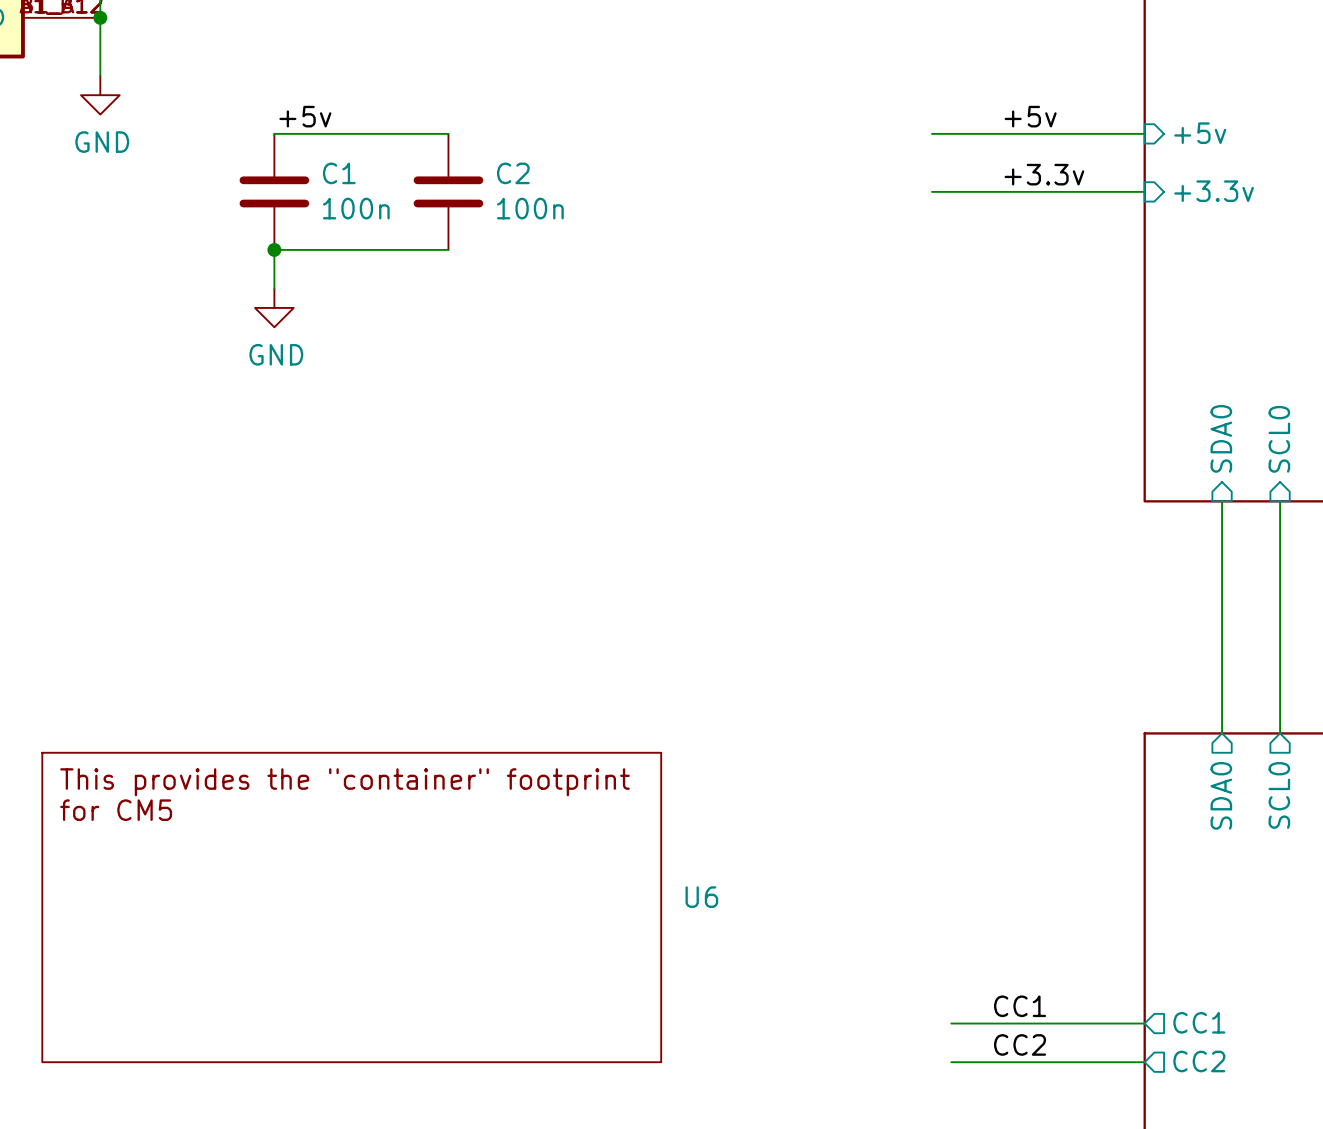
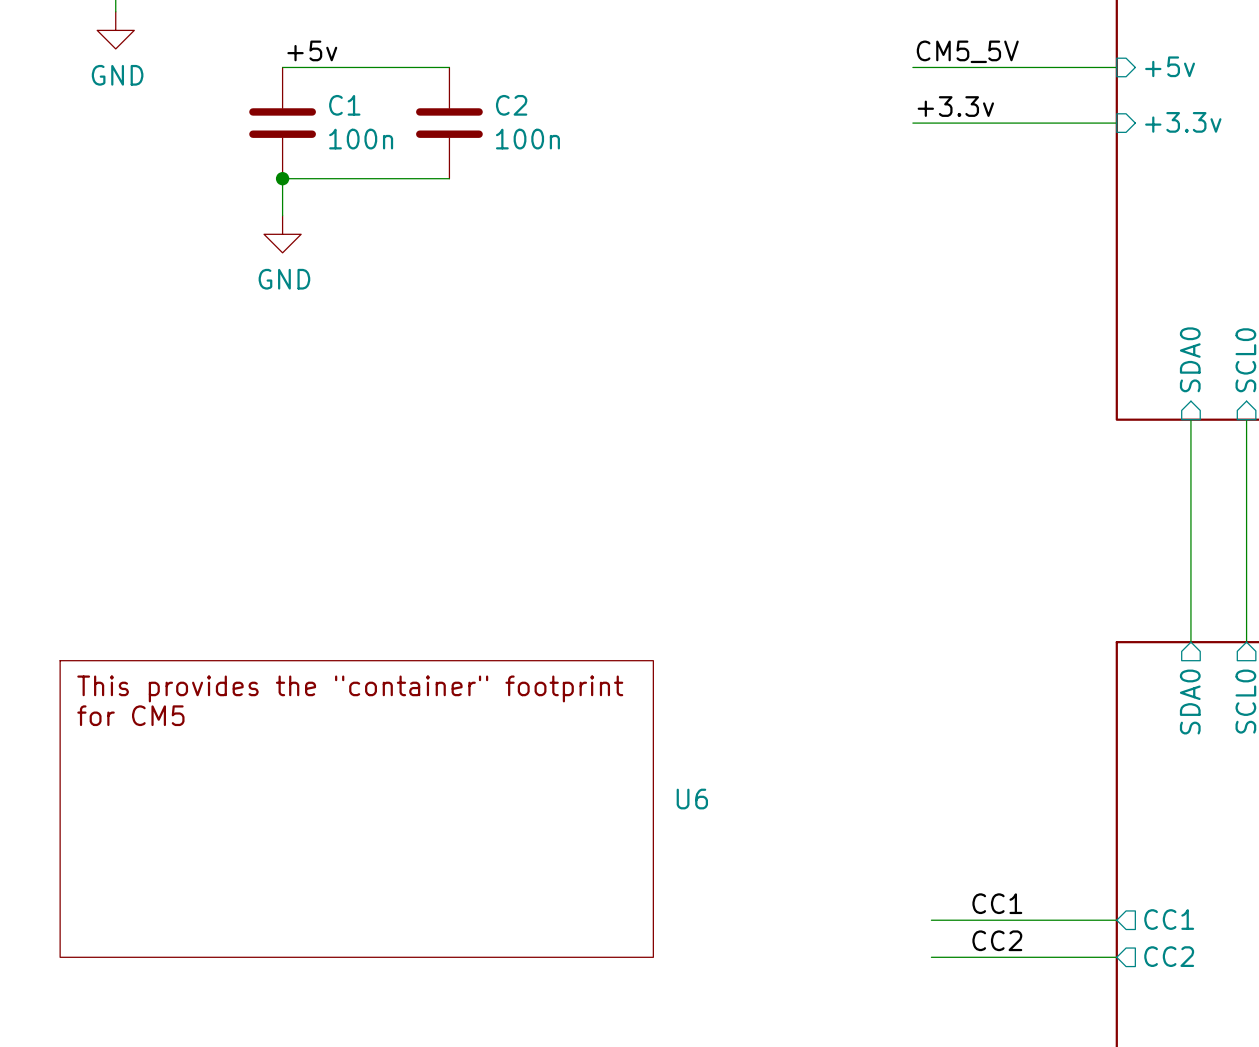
label: +5v (1030, 116) -> none
label: none -> CM5_5V (967, 51)
label position: +3.3v (1044, 174) -> +3.3v (955, 106)

